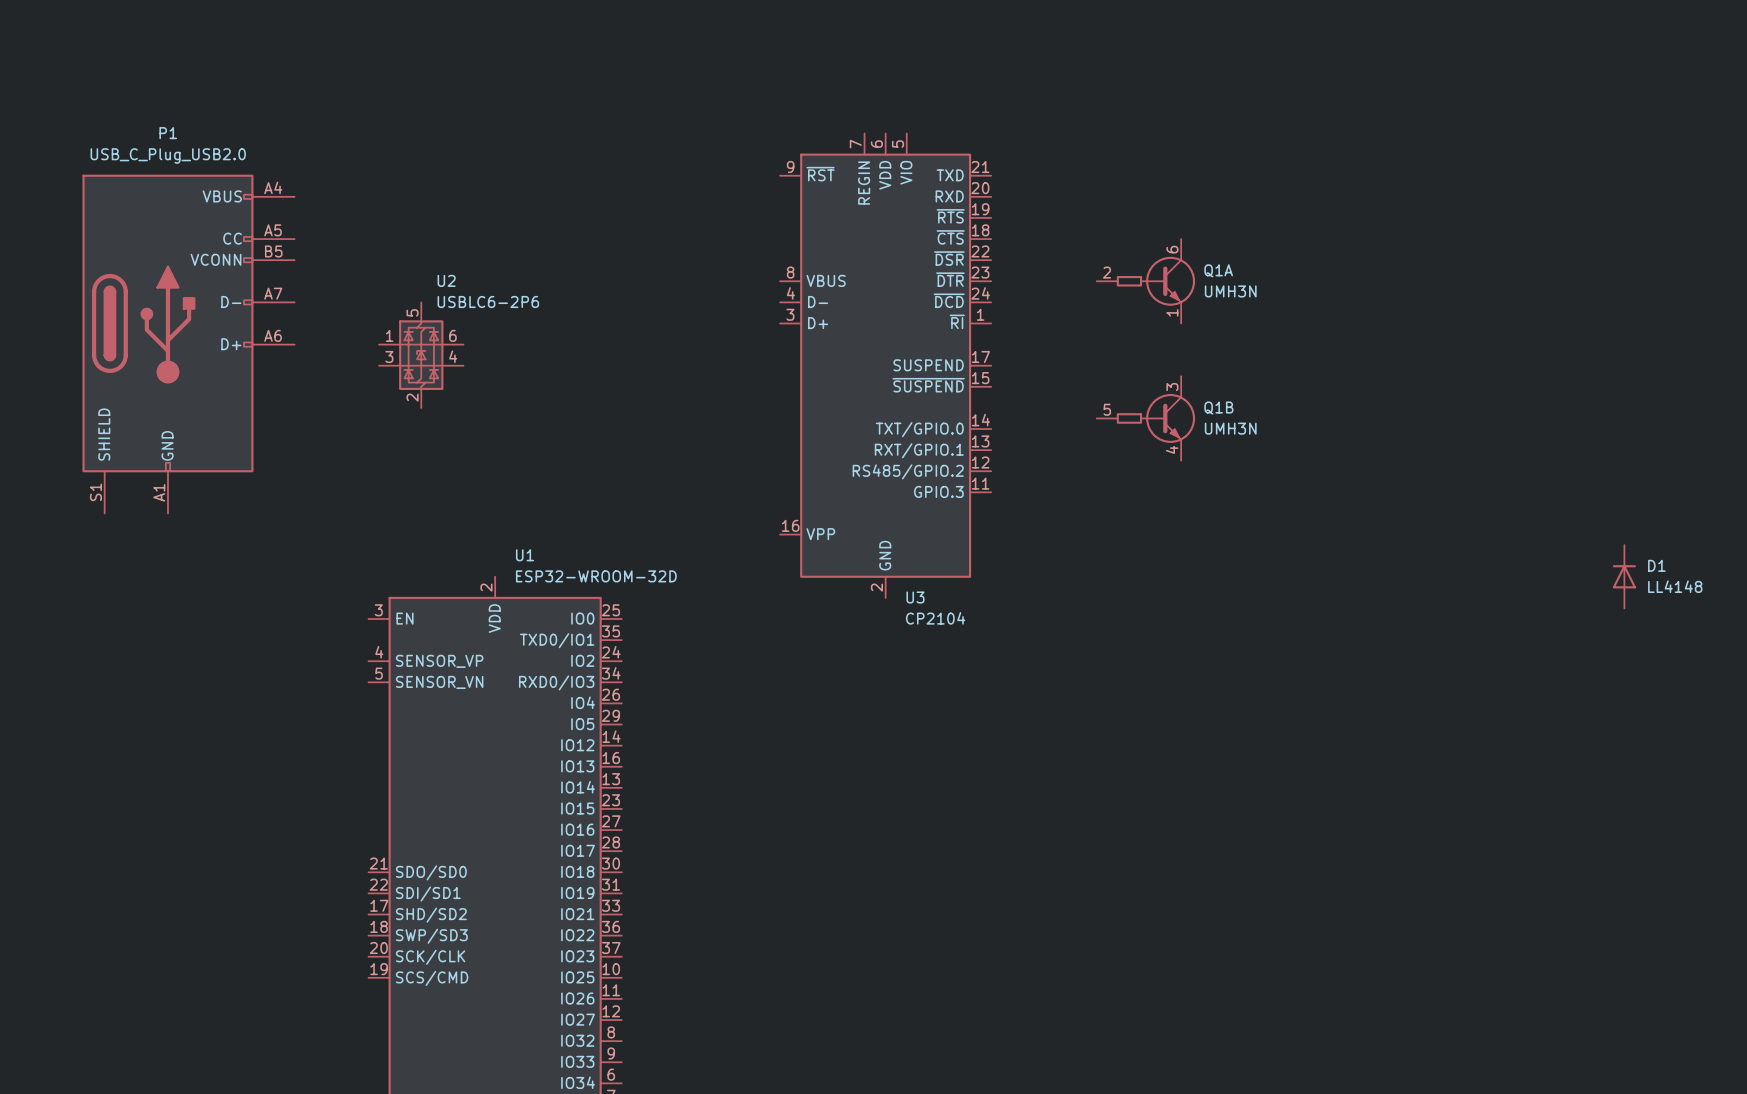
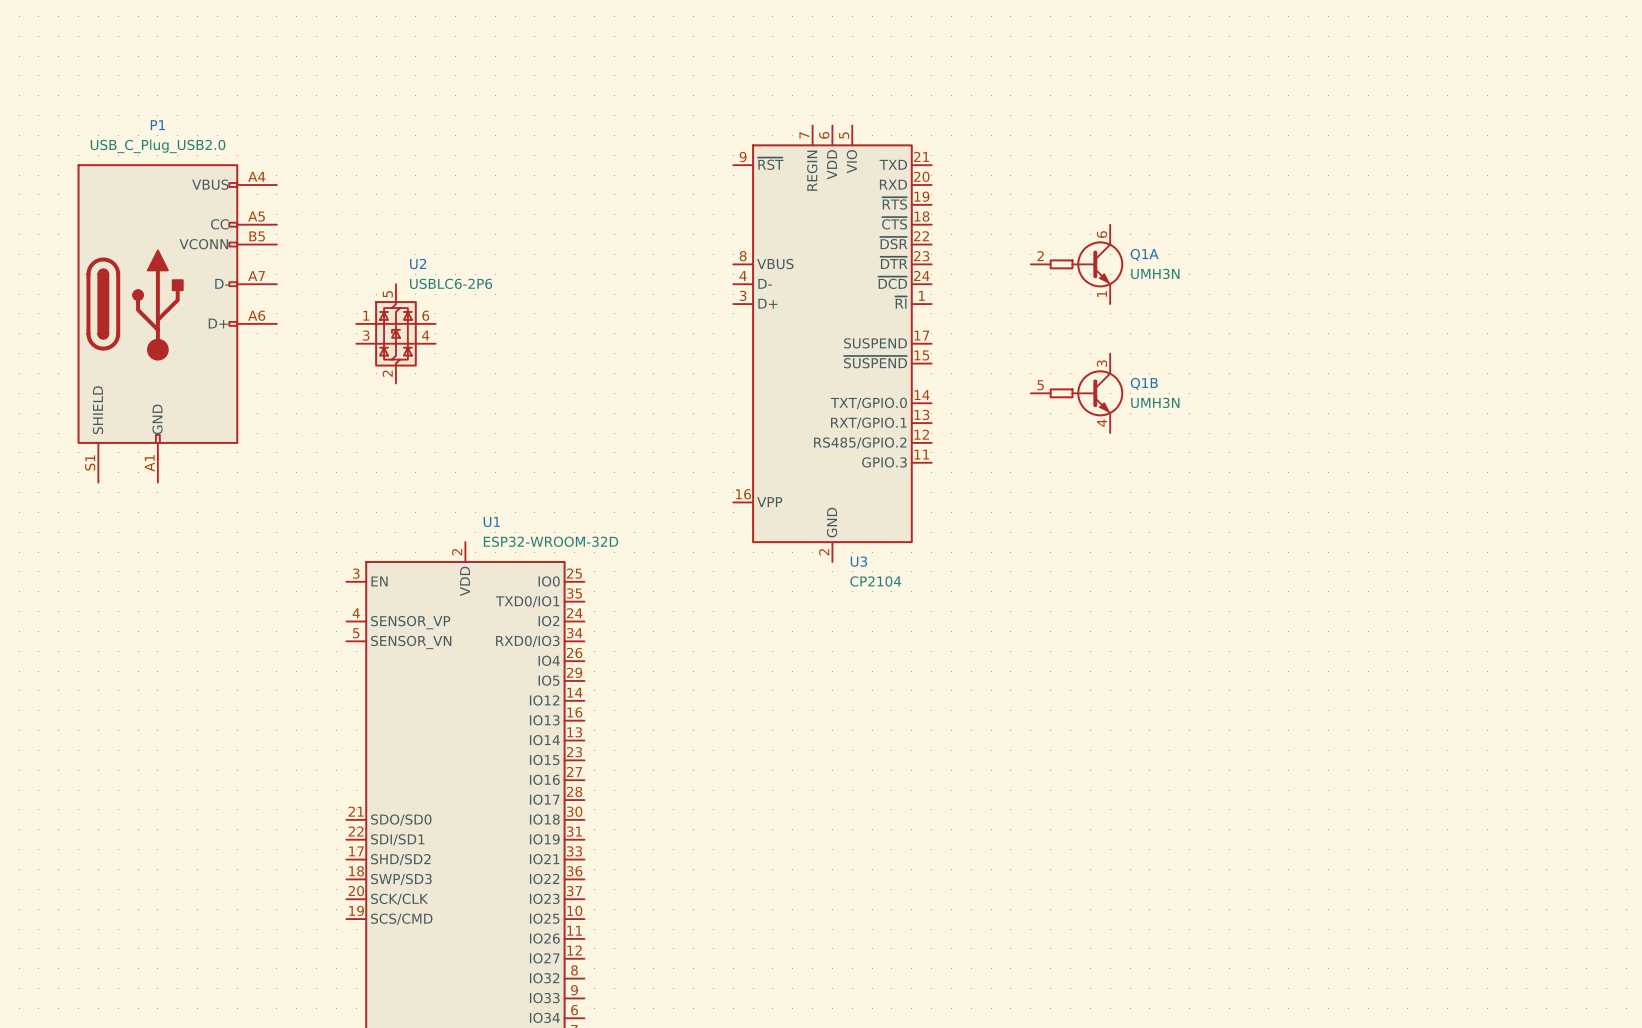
D1: LL4148 (1624, 576) -> none

